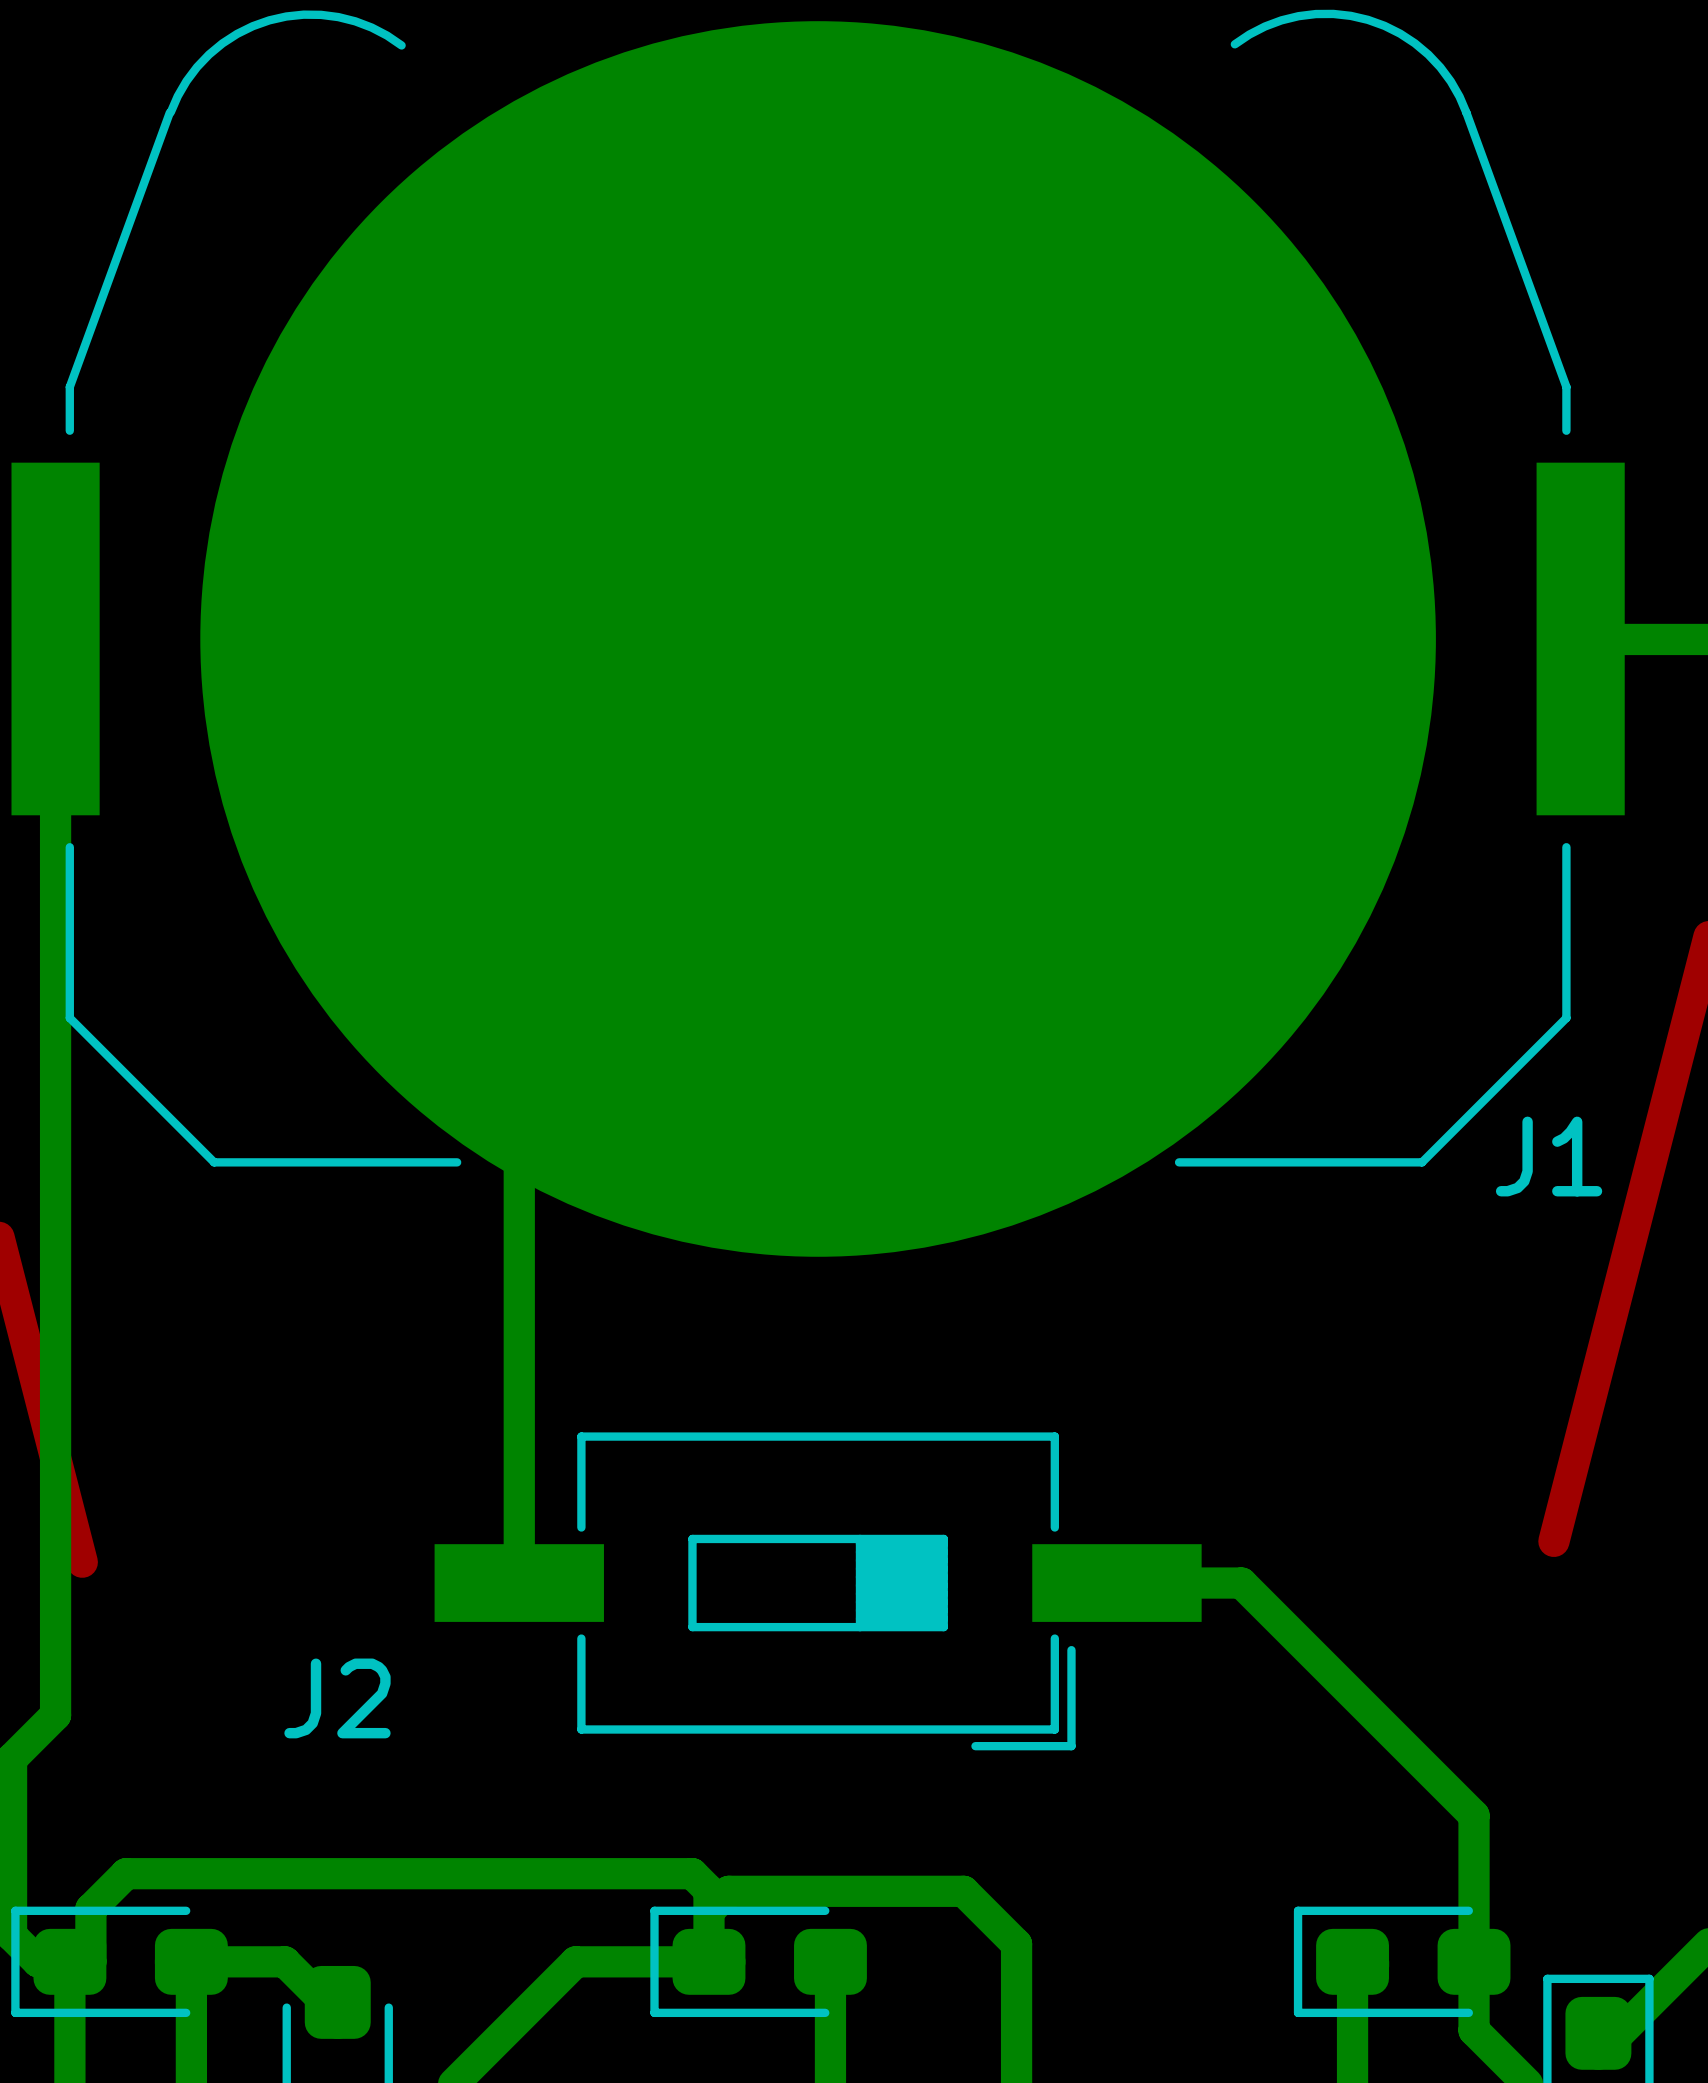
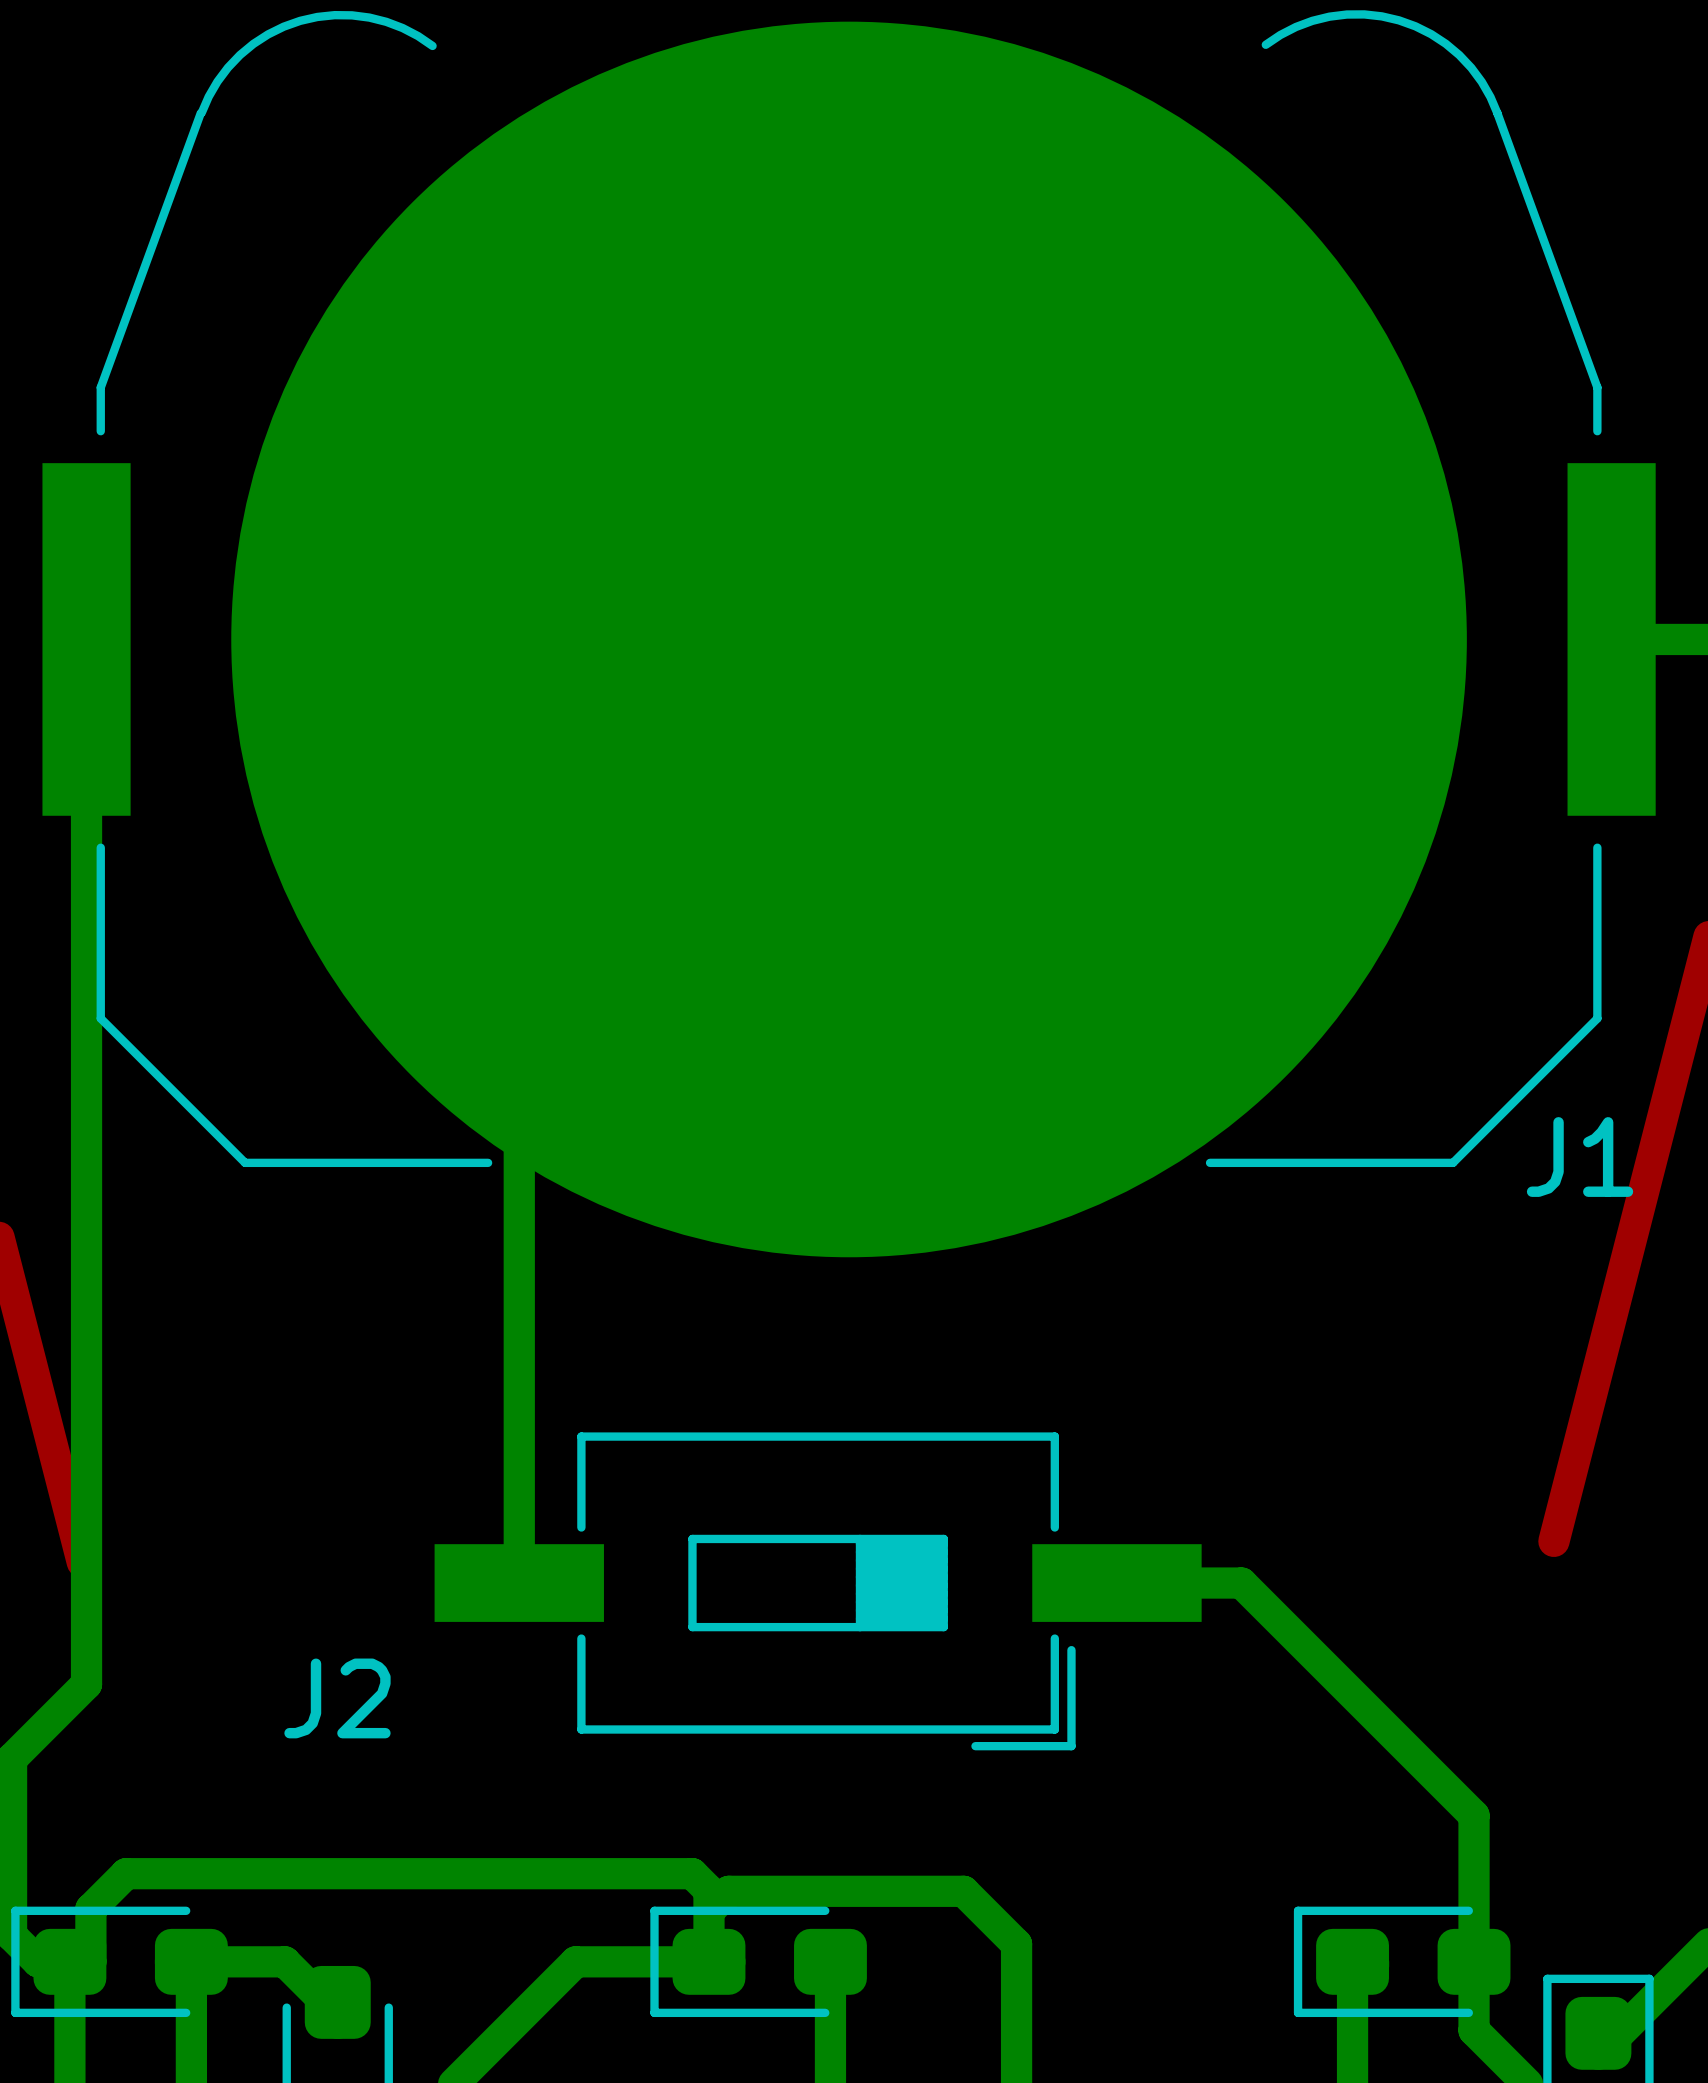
J1 position: (818, 633) -> (849, 633)
bottom track: (55, 638) (55, 1715) -> (86, 639) (86, 1684) (55, 1715)

